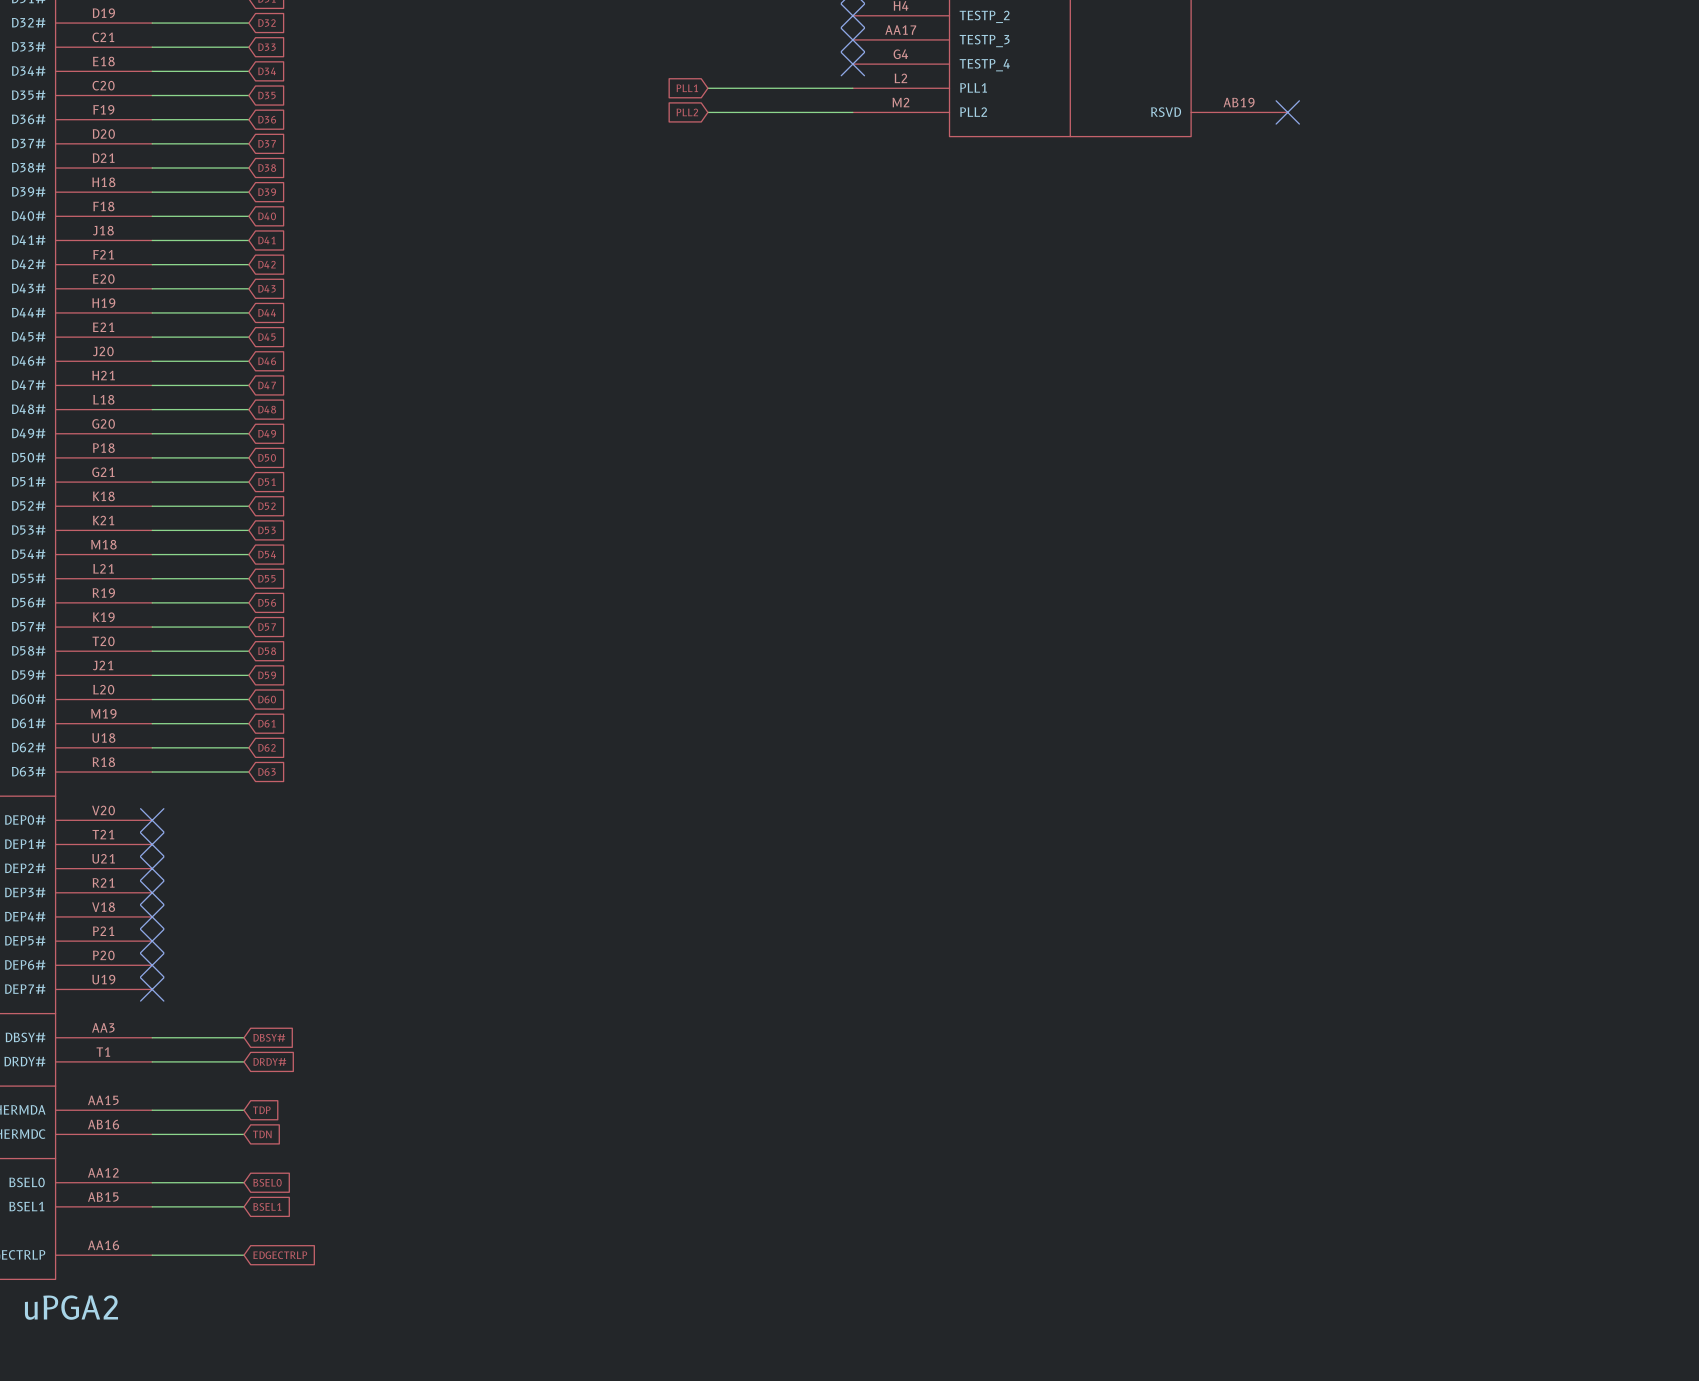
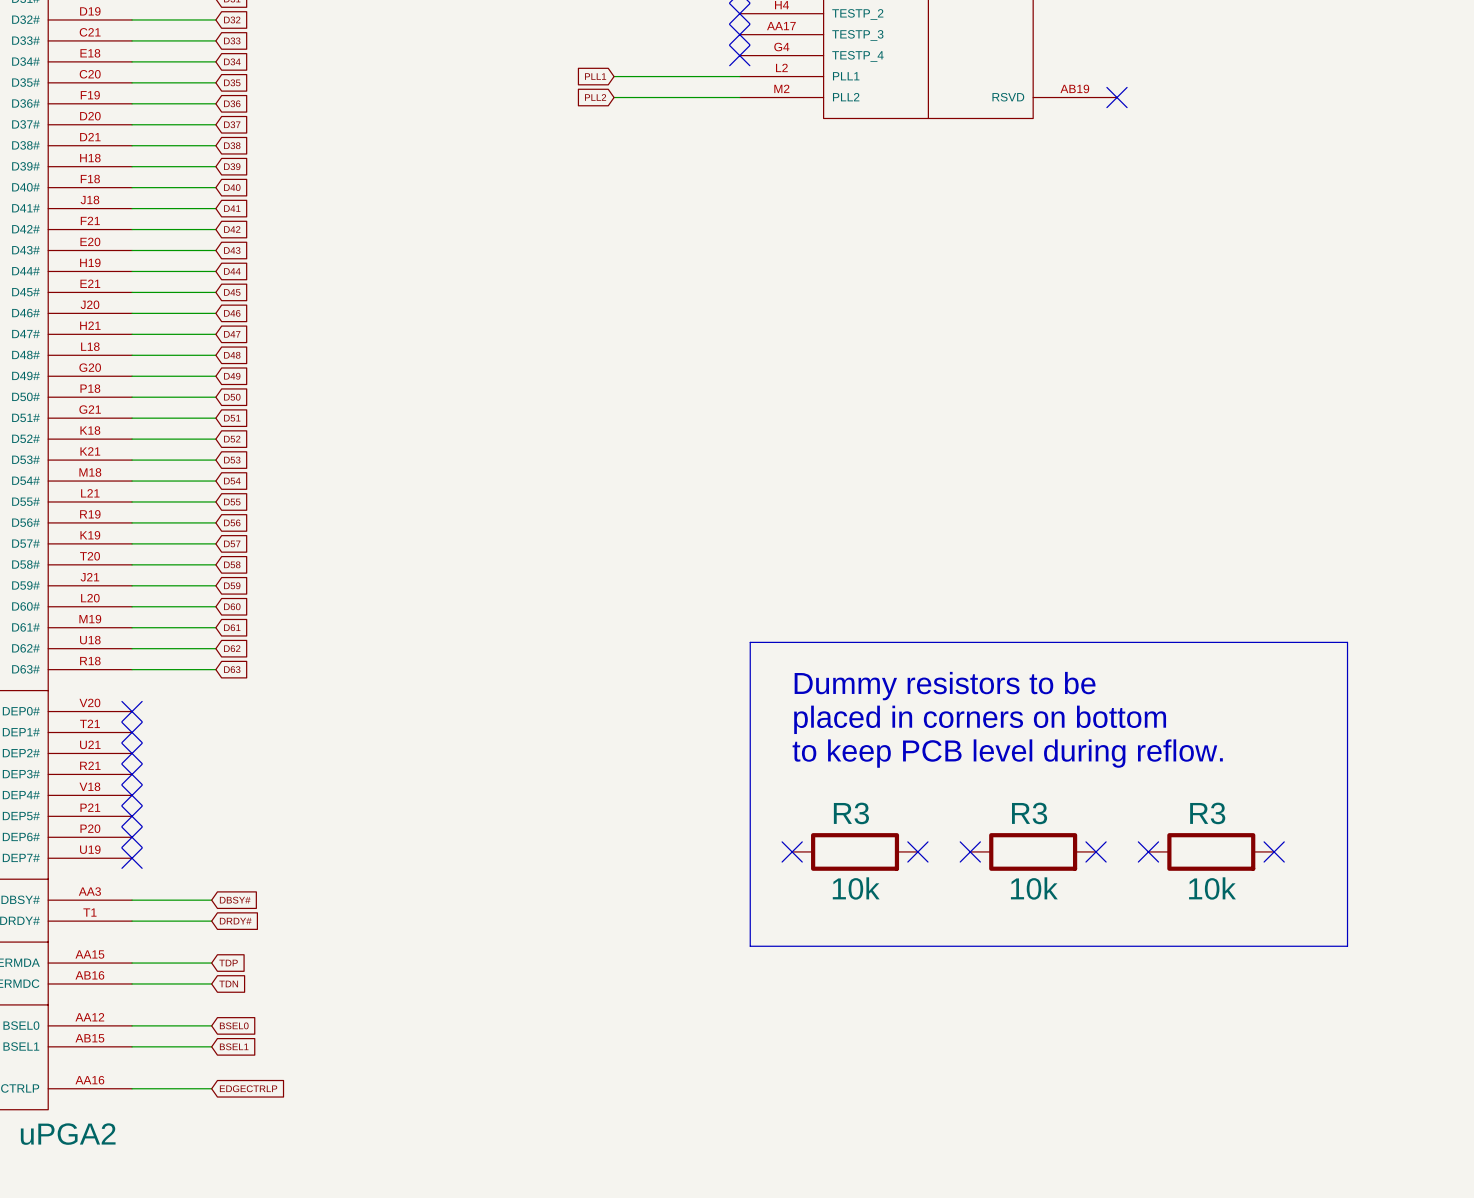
line: none -> (750, 642) (1347, 642) (1347, 946) (750, 946) (750, 642)
text: none -> Dummy resistors to be (945, 686)
text: none -> placed in corners on bottom (980, 719)
text: none -> to keep PCB level during reflow. (1007, 753)
no-connect mark: none -> (792, 851)
R3: none -> 10k (855, 851)
no-connect mark: none -> (917, 851)
no-connect mark: none -> (970, 851)
R3: none -> 10k (1033, 851)
no-connect mark: none -> (1096, 851)
no-connect mark: none -> (1148, 851)
R3: none -> 10k (1211, 851)
no-connect mark: none -> (1274, 851)

